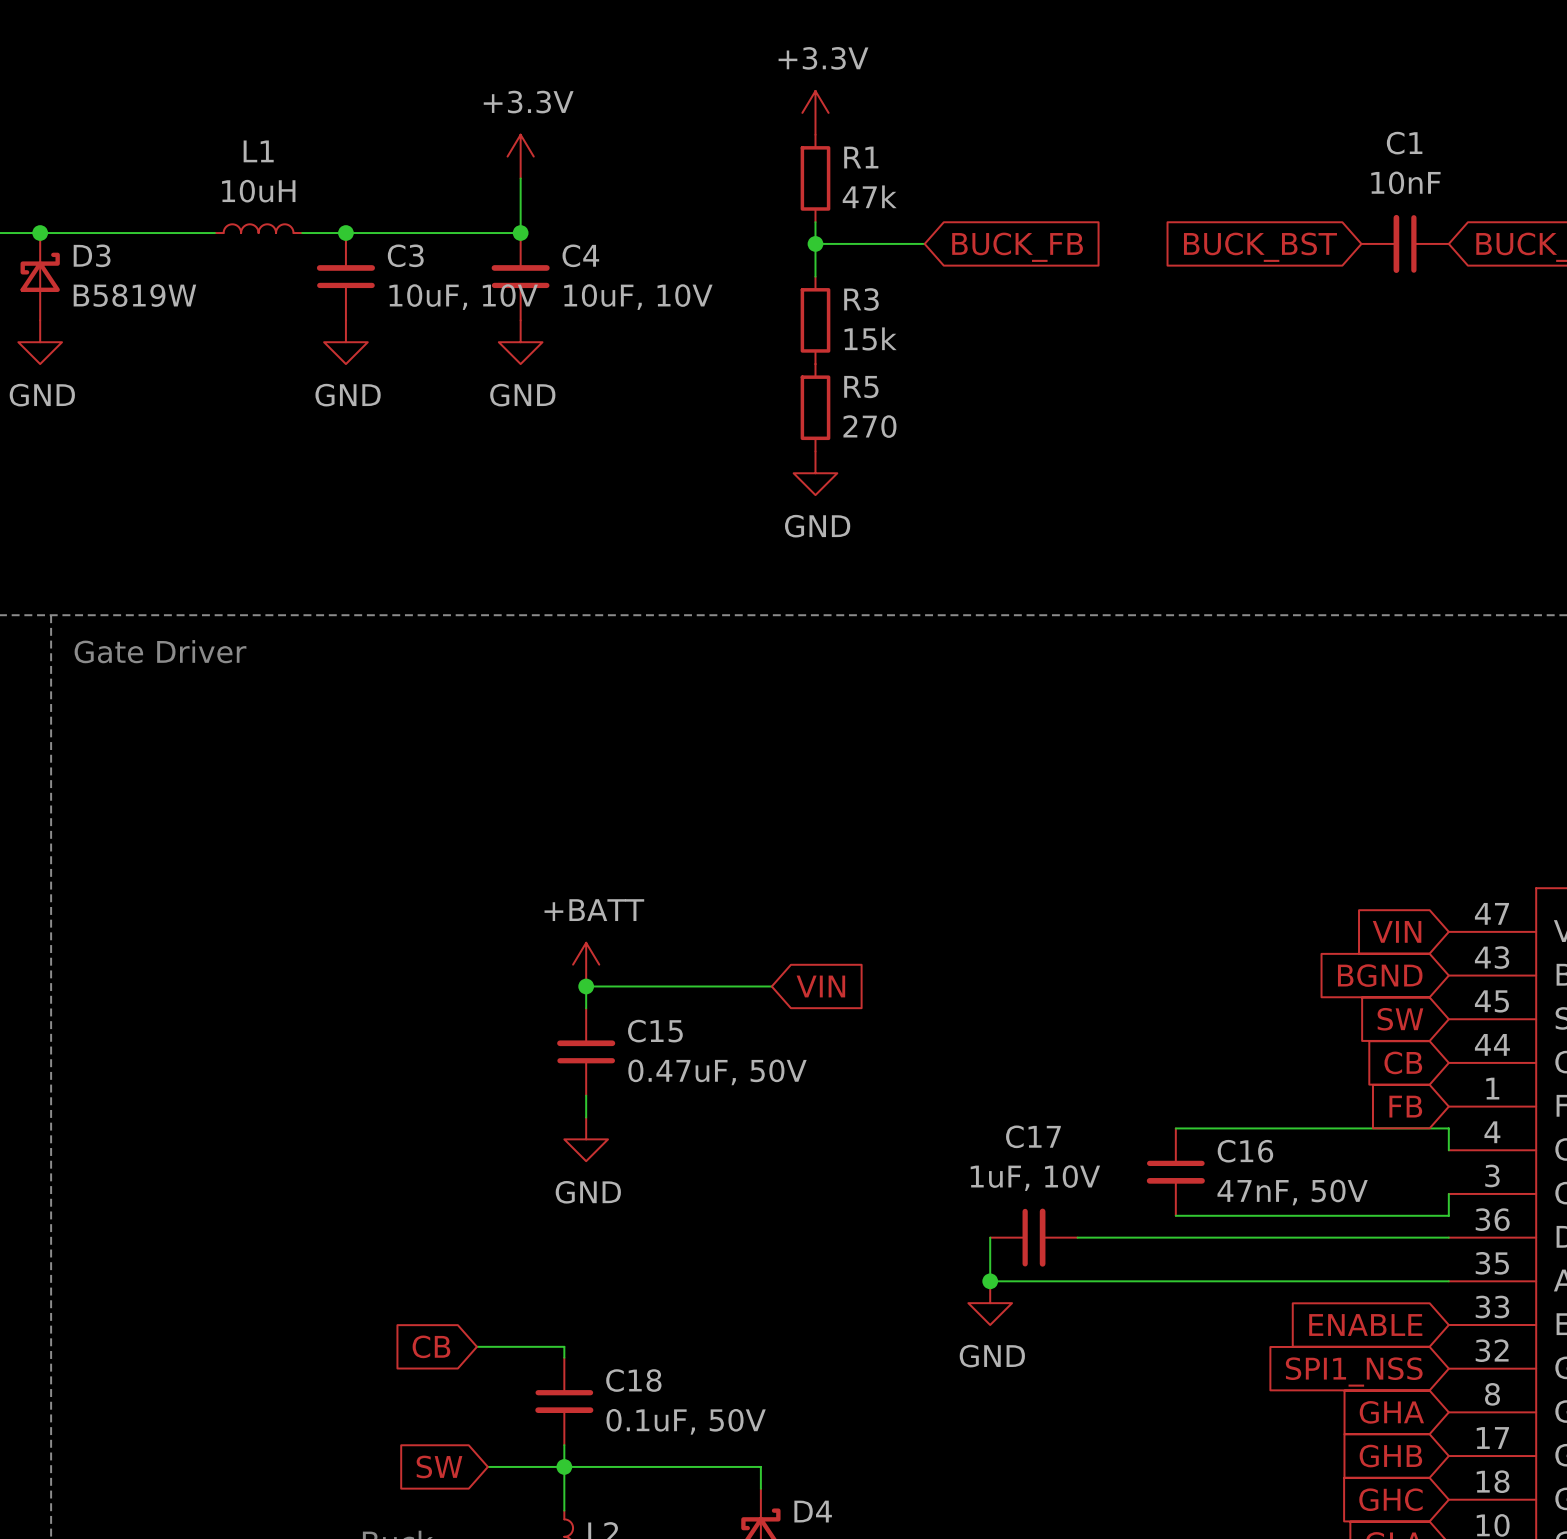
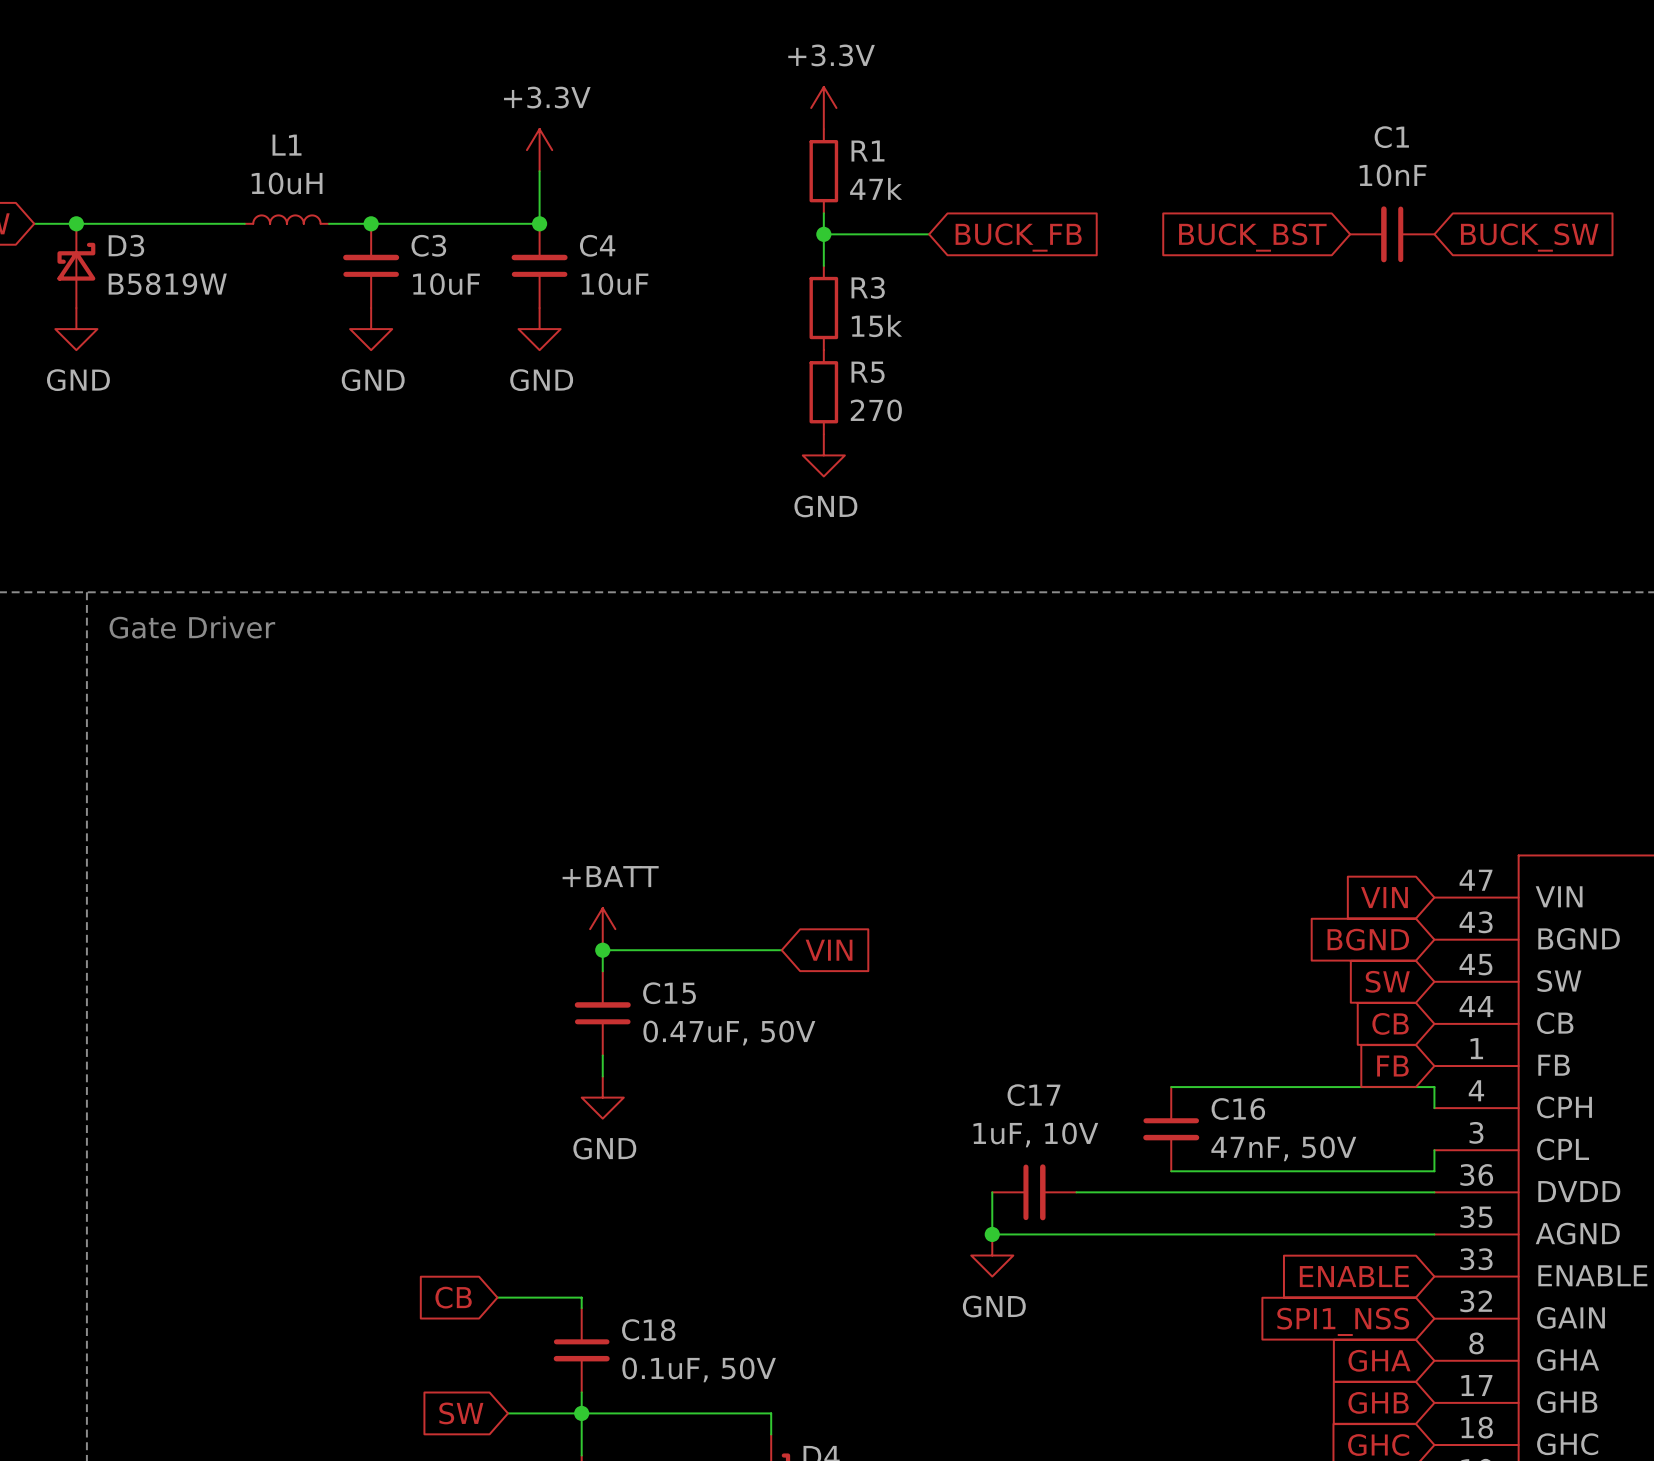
C3 value: 10uF, 10V (463, 297) -> 10uF (446, 284)
C4 value: 10uF, 10V (638, 297) -> 10uF (614, 284)

